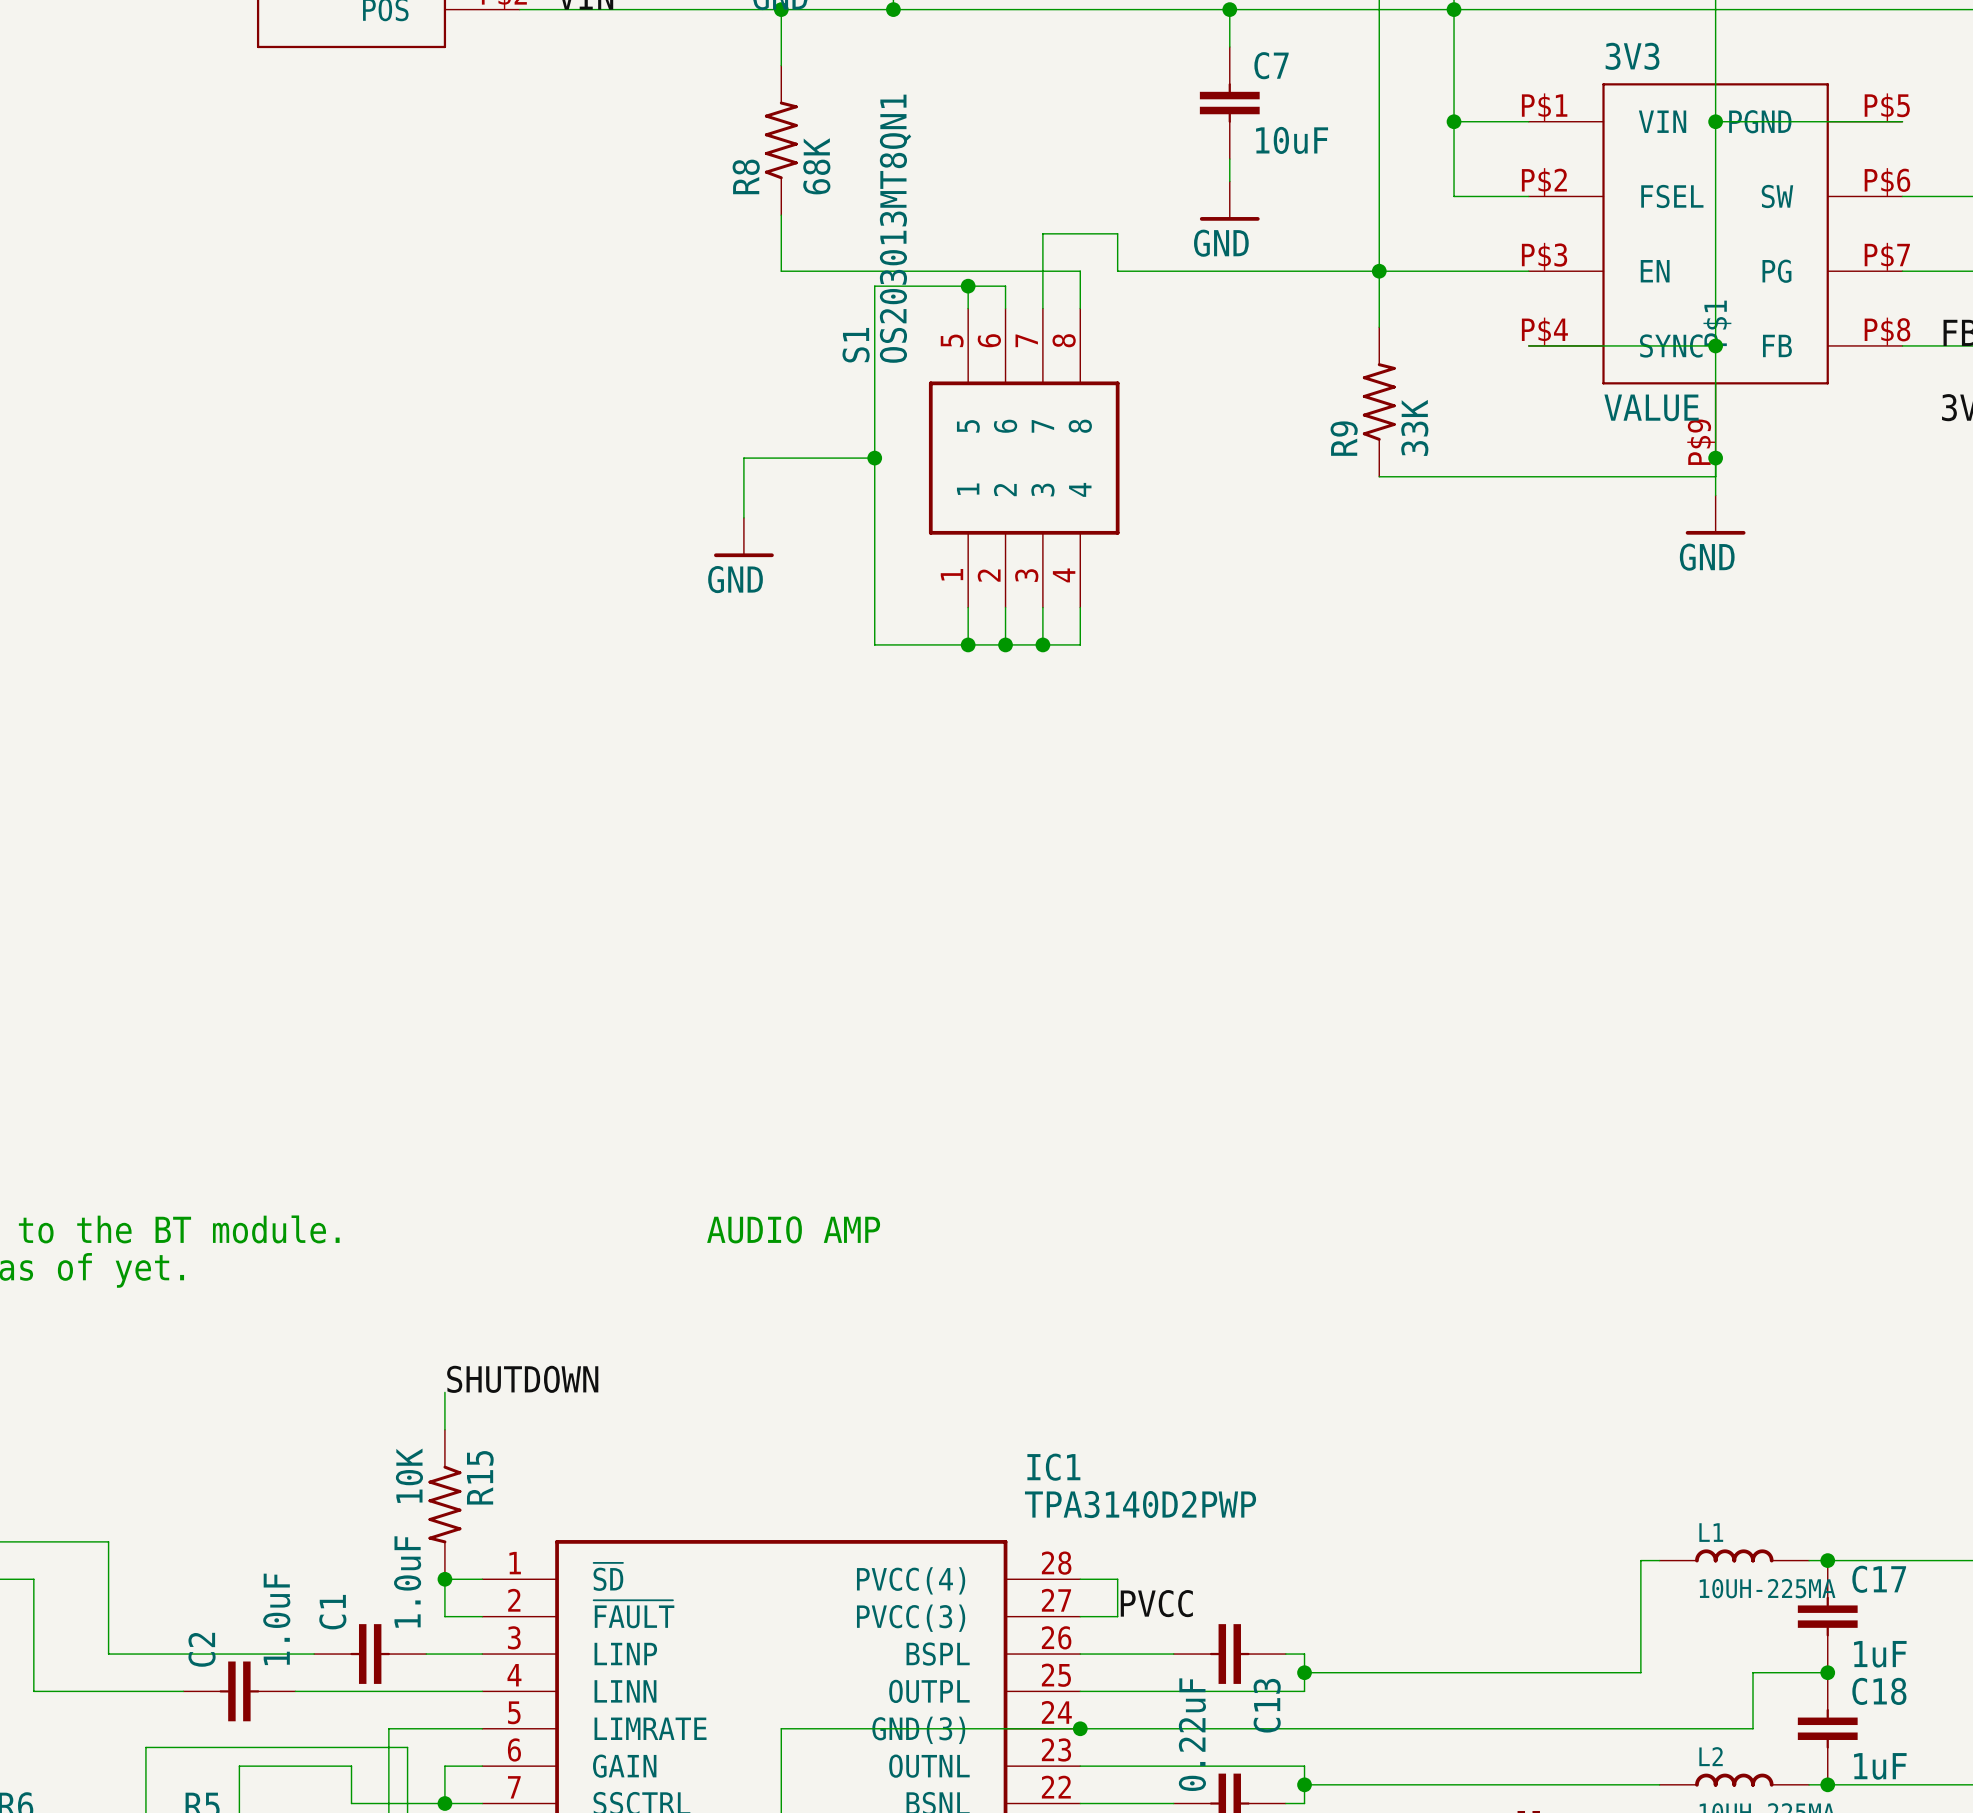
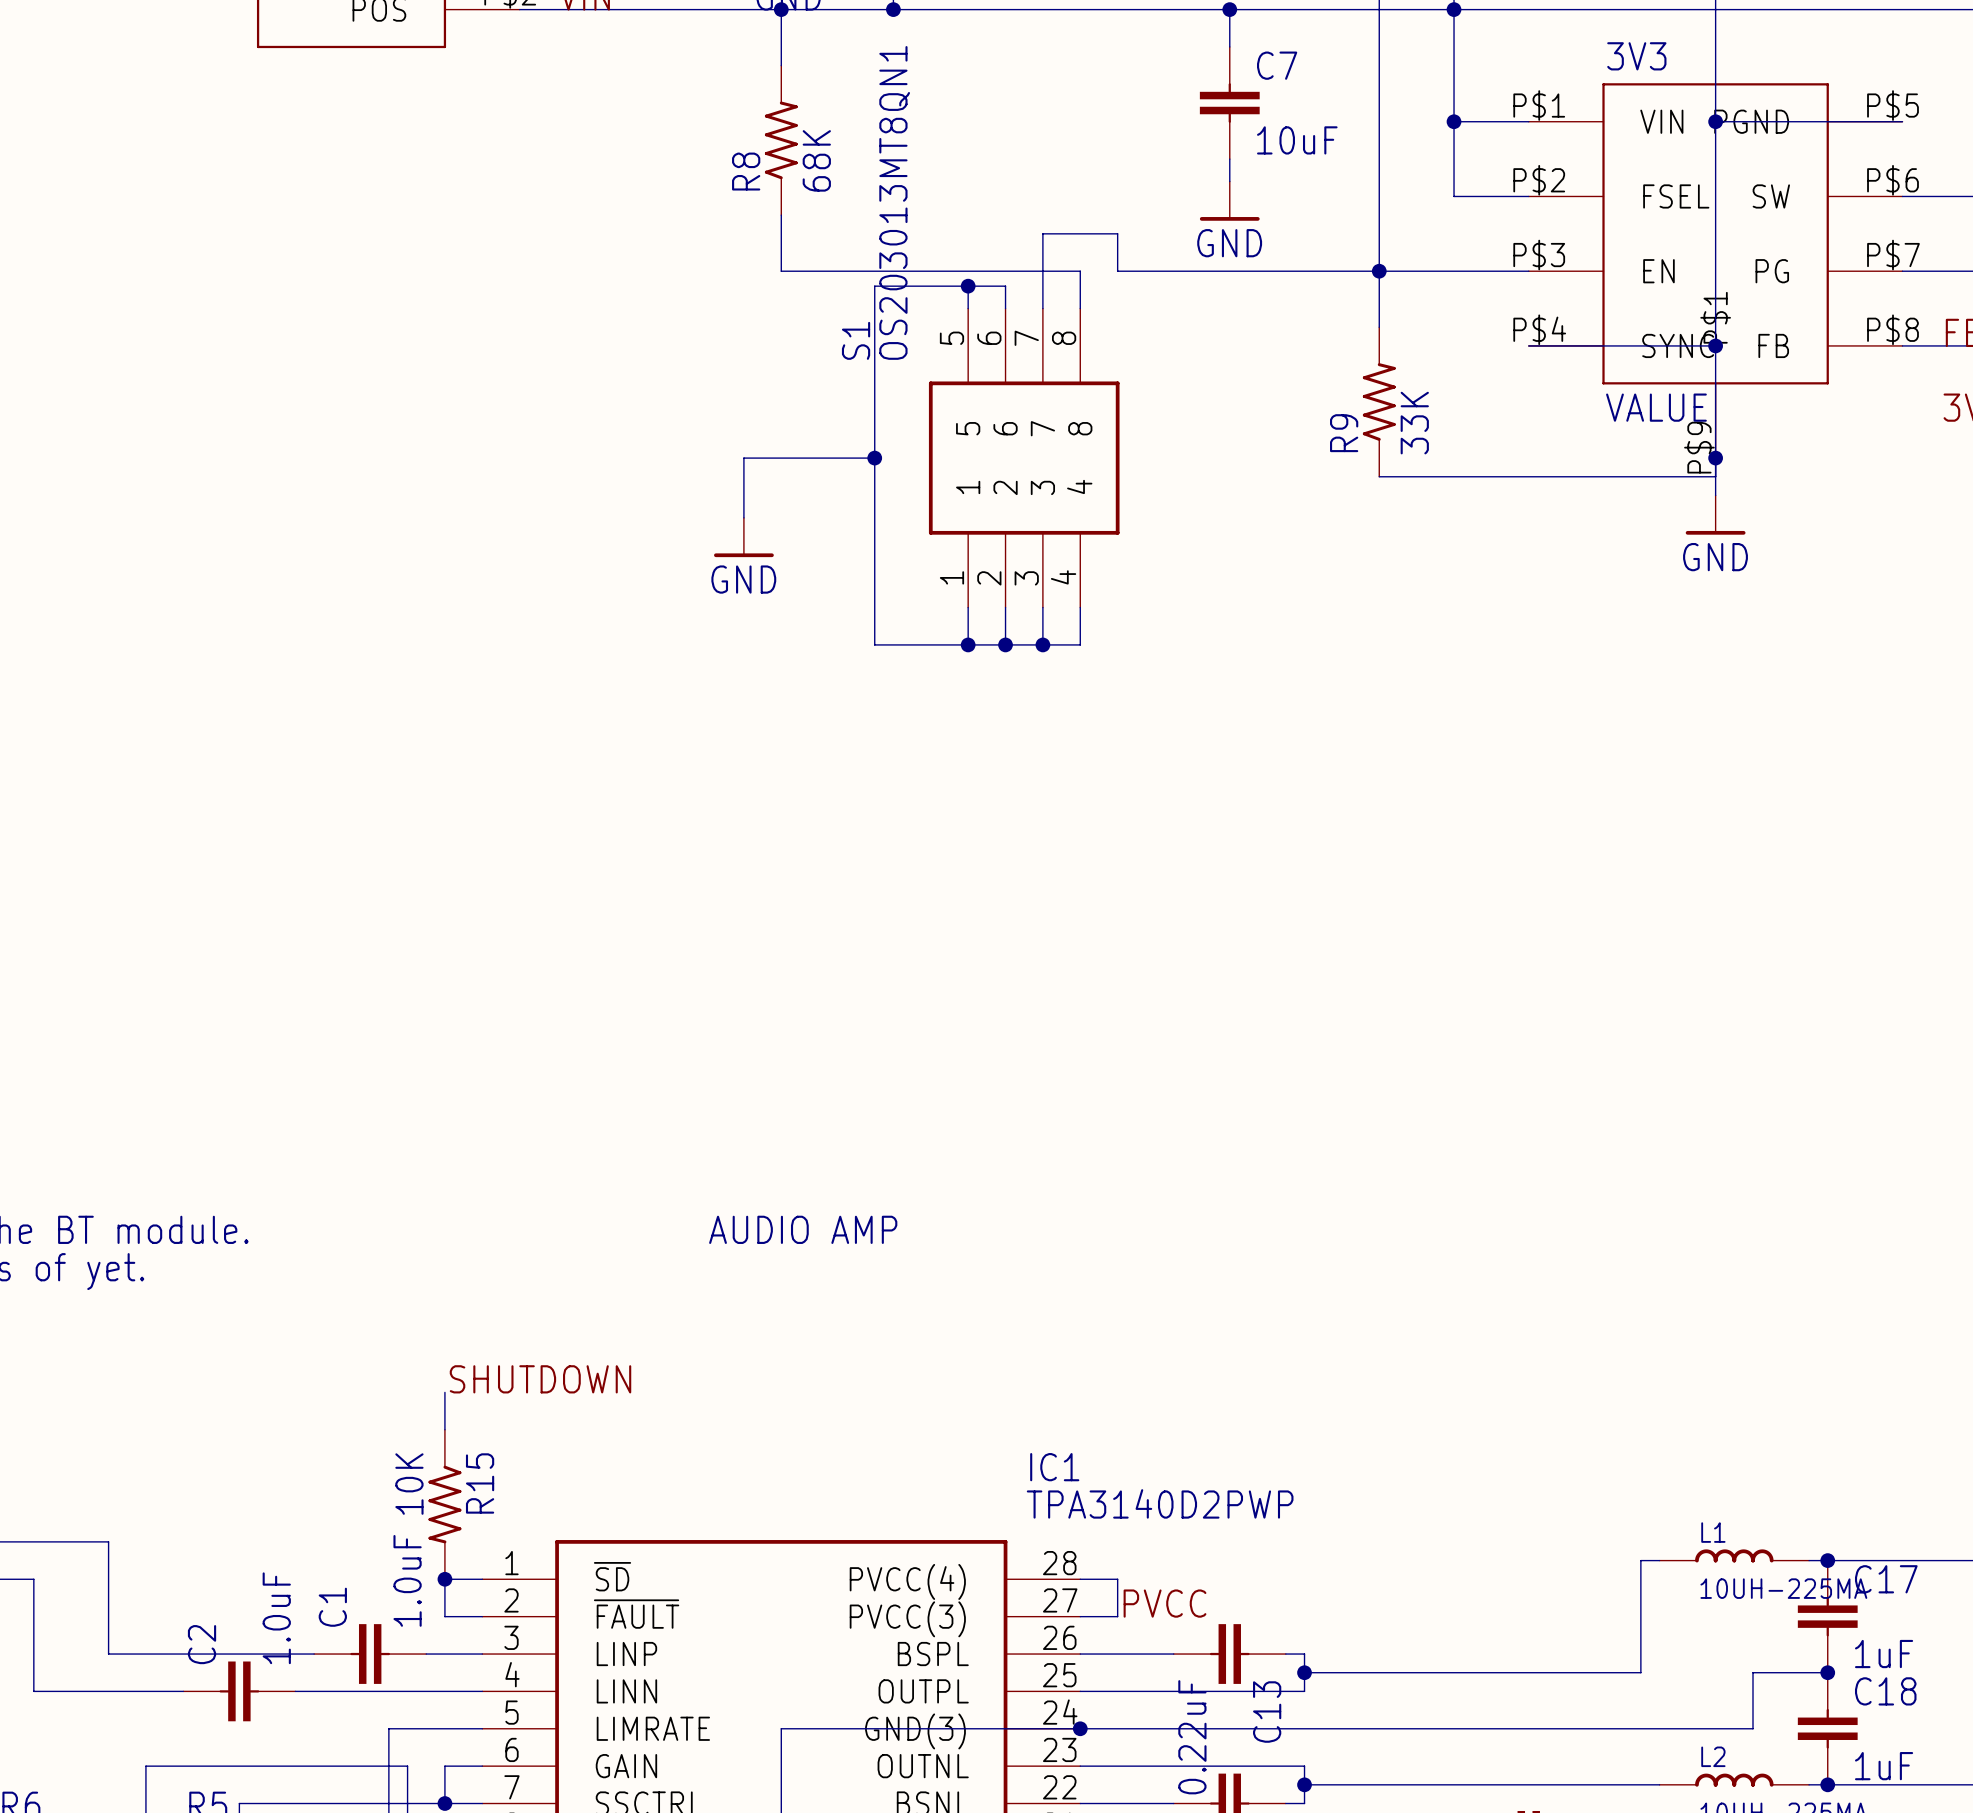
wire: (145, 1766) (145, 1747) (407, 1747) (407, 1766) -> none
wire: (239, 1766) (239, 1803) -> (239, 1766) (145, 1766)
wire: (351, 1766) (351, 1803) -> (351, 1766) (407, 1766)
wire: none -> (239, 1803) (351, 1803)

